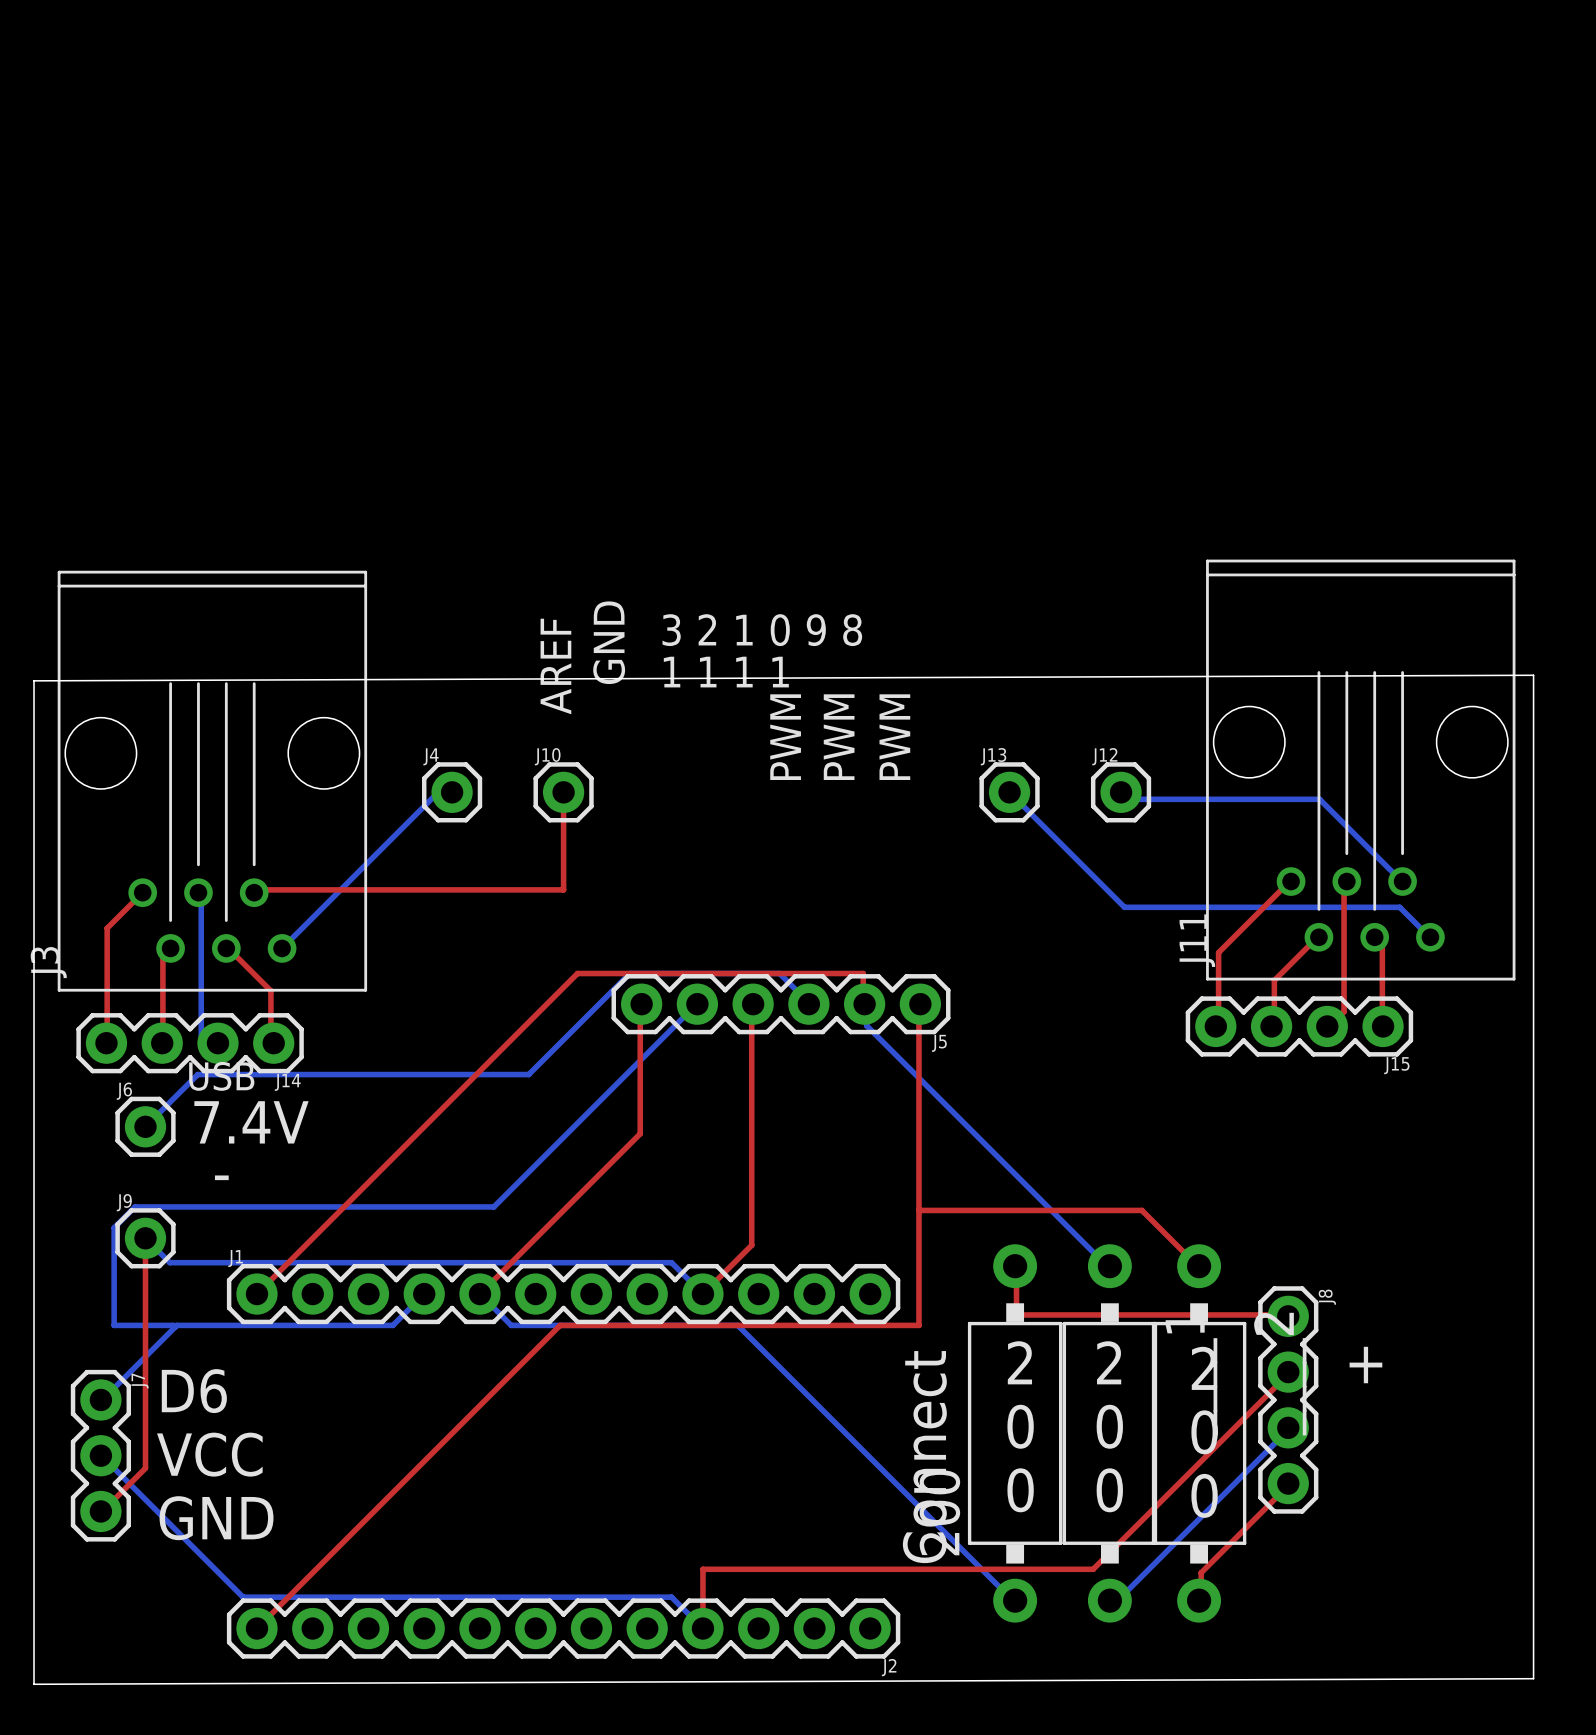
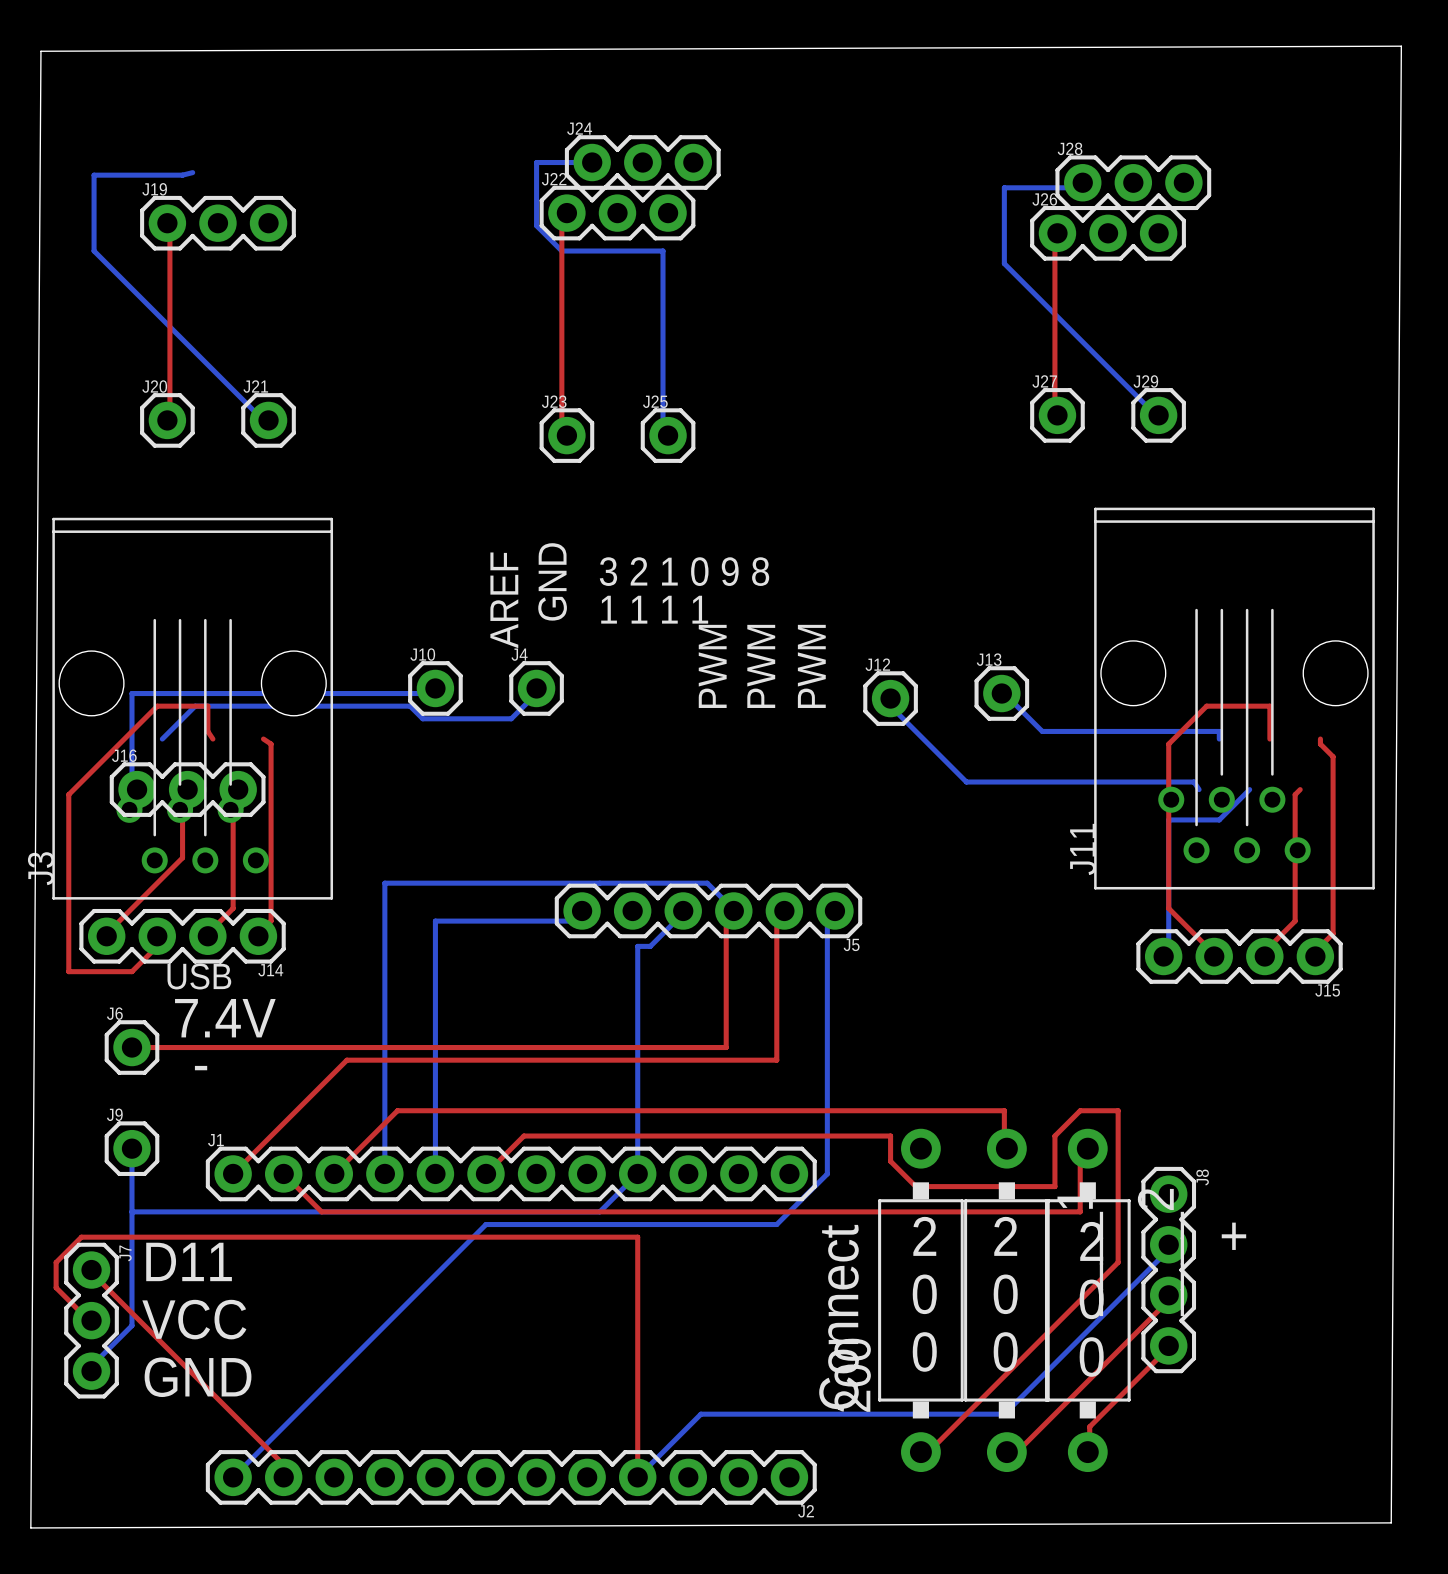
bottom track: none -> (592, 162) (536, 162) (536, 225) (561, 251) (663, 251) (663, 428) (668, 435)
J24: none -> (642, 162)
bottom track: none -> (192, 172) (182, 175) (94, 175) (94, 251) (258, 415) (268, 420)
bottom track: none -> (1082, 182) (1080, 187) (1004, 187) (1004, 263) (1156, 415) (1158, 415)
J28: none -> (1133, 182)
top track: none -> (566, 213) (561, 213) (561, 428) (566, 435)
J22: none -> (617, 213)
top track: none -> (167, 223) (169, 225) (169, 415) (167, 420)
J19: none -> (217, 223)
top track: none -> (1057, 233) (1054, 238) (1054, 415) (1057, 415)
J26: none -> (1108, 233)
J27: none -> (1057, 415)
J29: none -> (1158, 415)
J20: none -> (167, 420)
J21: none -> (268, 420)
J23: none -> (566, 435)
J25: none -> (668, 435)
bottom track: none -> (435, 688) (435, 693) (131, 693) (131, 782) (137, 789)
bottom track: none -> (536, 688) (536, 693) (511, 718) (422, 718) (410, 706) (195, 706) (162, 739)
bottom track: none -> (1001, 693) (1004, 693) (1042, 731) (1219, 731) (1219, 739)
bottom track: none -> (890, 698) (890, 706) (966, 782) (1194, 782) (1199, 789)
bottom track: (452, 792) (438, 792) (282, 948) -> none
J4 position: (452, 792) -> (536, 688)
top track: (563, 792) (563, 889) (256, 889) (254, 892) -> none
J10 position: (563, 792) -> (435, 688)
bottom track: (1009, 792) (1124, 907) (1399, 907) (1430, 937) -> none
J13 position: (1009, 792) -> (1001, 693)
bottom track: (1121, 792) (1128, 799) (1319, 799) (1402, 881) -> none
J12 position: (1121, 792) -> (890, 698)
top track: none -> (212, 739) (207, 731) (207, 706) (157, 706) (68, 794) (68, 971) (131, 971) (157, 946) (157, 936)
top track: none -> (263, 739) (271, 744) (271, 921) (258, 933) (258, 936)
top track: none -> (1269, 739) (1269, 706) (1206, 706) (1168, 744) (1168, 908) (1214, 956)
top track: none -> (1320, 739) (1320, 744) (1333, 756) (1333, 933) (1320, 946) (1315, 956)
top track: none -> (187, 789) (182, 794) (182, 857) (106, 933) (106, 936)
J16: none -> (187, 789)
top track: none -> (238, 789) (233, 794) (233, 908) (207, 933) (207, 936)
bottom track: none -> (1249, 789) (1219, 819) (1168, 819) (1168, 946) (1163, 956)
top track: none -> (1300, 789) (1295, 794) (1295, 921) (1269, 946) (1264, 956)
top track: (1291, 881) (1218, 952) (1218, 1025) (1215, 1026) -> none
top track: (1346, 881) (1344, 882) (1344, 1011) (1327, 1026) -> none
top track: (142, 892) (107, 928) (106, 1043) -> none
bottom track: (198, 892) (201, 893) (201, 1043) (217, 1043) -> none
top track: (1318, 937) (1274, 980) (1274, 1025) (1271, 1026) -> none
top track: (1374, 937) (1382, 945) (1383, 1026) -> none
top track: (170, 948) (162, 956) (162, 1043) -> none
top track: (226, 948) (270, 990) (270, 1043) (273, 1043) -> none
bottom track: (629, 973) (528, 1074) (197, 1074) (145, 1126) -> (571, 883) (384, 883) (384, 1173)
top track: (641, 1004) (640, 1133) (479, 1294) -> none
bottom track: (697, 1004) (493, 1206) (135, 1206) (114, 1227) (114, 1325) (173, 1325) (175, 1327) -> none
top track: (753, 1004) (751, 1245) (702, 1294) -> none
bottom track: none -> (683, 910) (650, 946) (637, 946) (637, 1173) (599, 1211) (131, 1211)
top track: none -> (733, 910) (726, 921) (726, 1047) (131, 1047)
top track: (864, 1004) (863, 973) (577, 973) (382, 1168) -> (784, 910) (776, 921) (776, 1060) (346, 1060)
bottom track: (864, 1004) (866, 1004) (866, 1025) (1107, 1266) (1109, 1266) -> none
top track: (920, 1004) (918, 1325) (560, 1325) (256, 1628) -> none
bottom track: none -> (834, 910) (827, 921) (827, 1173) (776, 1224) (486, 1224) (233, 1477)
J15 position: (1299, 1026) -> (1239, 956)
J14 position: (190, 1043) -> (182, 936)
J6 position: (145, 1126) -> (131, 1047)
top track: (918, 1210) (1141, 1210) (1197, 1266) -> (283, 1173) (321, 1211) (1080, 1211) (1080, 1148) (1086, 1148)
top track: (145, 1238) (145, 1468) (100, 1511) -> none
bottom track: (145, 1238) (169, 1262) (671, 1262) (702, 1294) -> none
J9 position: (145, 1238) -> (131, 1148)
bottom track: none -> (131, 1148) (131, 1325) (94, 1363) (91, 1371)
top track: (1015, 1266) (1016, 1314) (1288, 1316) -> none
top track: none -> (1006, 1148) (1004, 1148) (1004, 1110) (397, 1110) (334, 1173)
bottom track: (424, 1294) (392, 1325) (176, 1325) (100, 1399) -> none
bottom track: (479, 1294) (511, 1325) (737, 1325) (1015, 1600) -> (435, 1173) (435, 921) (574, 921) (582, 910)
top track: none -> (486, 1173) (523, 1136) (890, 1136) (890, 1161) (915, 1186) (1054, 1186) (1054, 1136) (1080, 1110) (1118, 1110) (1118, 1262) (928, 1452) (920, 1452)
top track: (1288, 1372) (1093, 1569) (702, 1569) -> (91, 1320) (56, 1287) (56, 1262) (81, 1237) (637, 1237) (637, 1423)
text: D6 (194, 1391) -> D11 (189, 1261)
top track: none -> (91, 1270) (94, 1275) (283, 1464) (283, 1477)
top track: none -> (1168, 1295) (1168, 1300) (1017, 1452) (1006, 1452)
bottom track: (1288, 1427) (1117, 1600) (1109, 1600) -> none
bottom track: (100, 1455) (243, 1597) (671, 1597) (702, 1628) -> (1168, 1244) (1168, 1249) (1004, 1414) (700, 1414) (637, 1477)
board edge: (1533, 1678) (1533, 675) (34, 680) (34, 1684) -> (1391, 1522) (1401, 46) (40, 51) (30, 1527)

